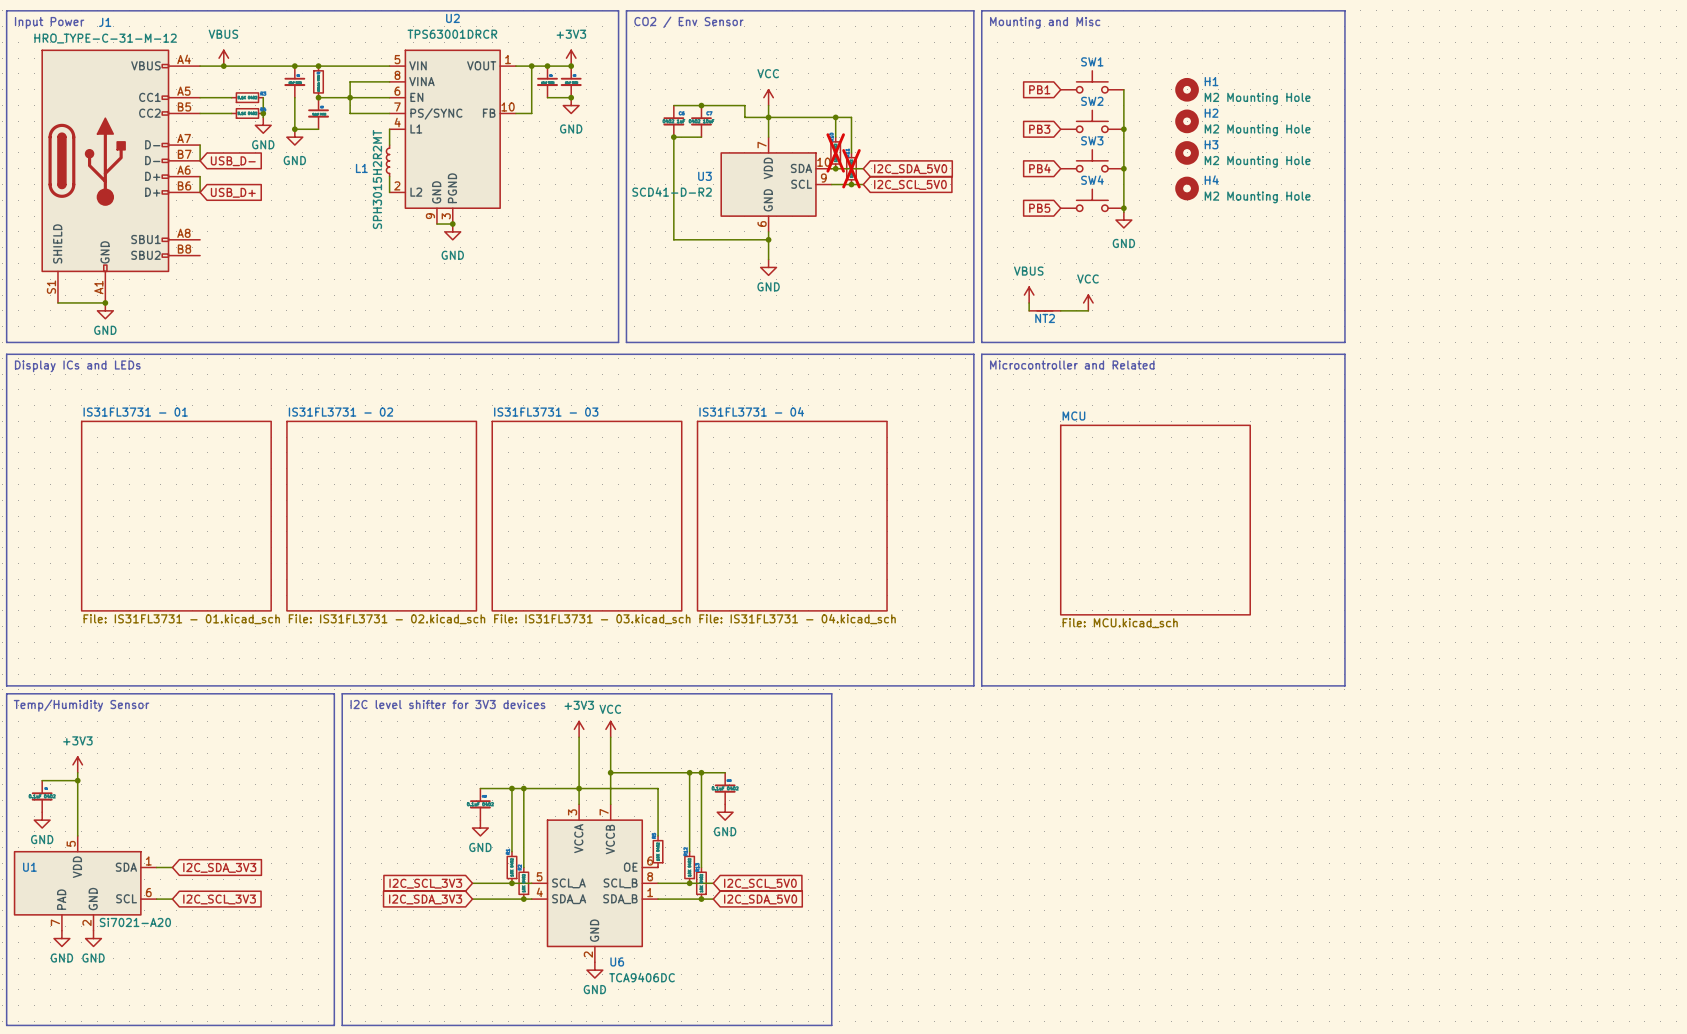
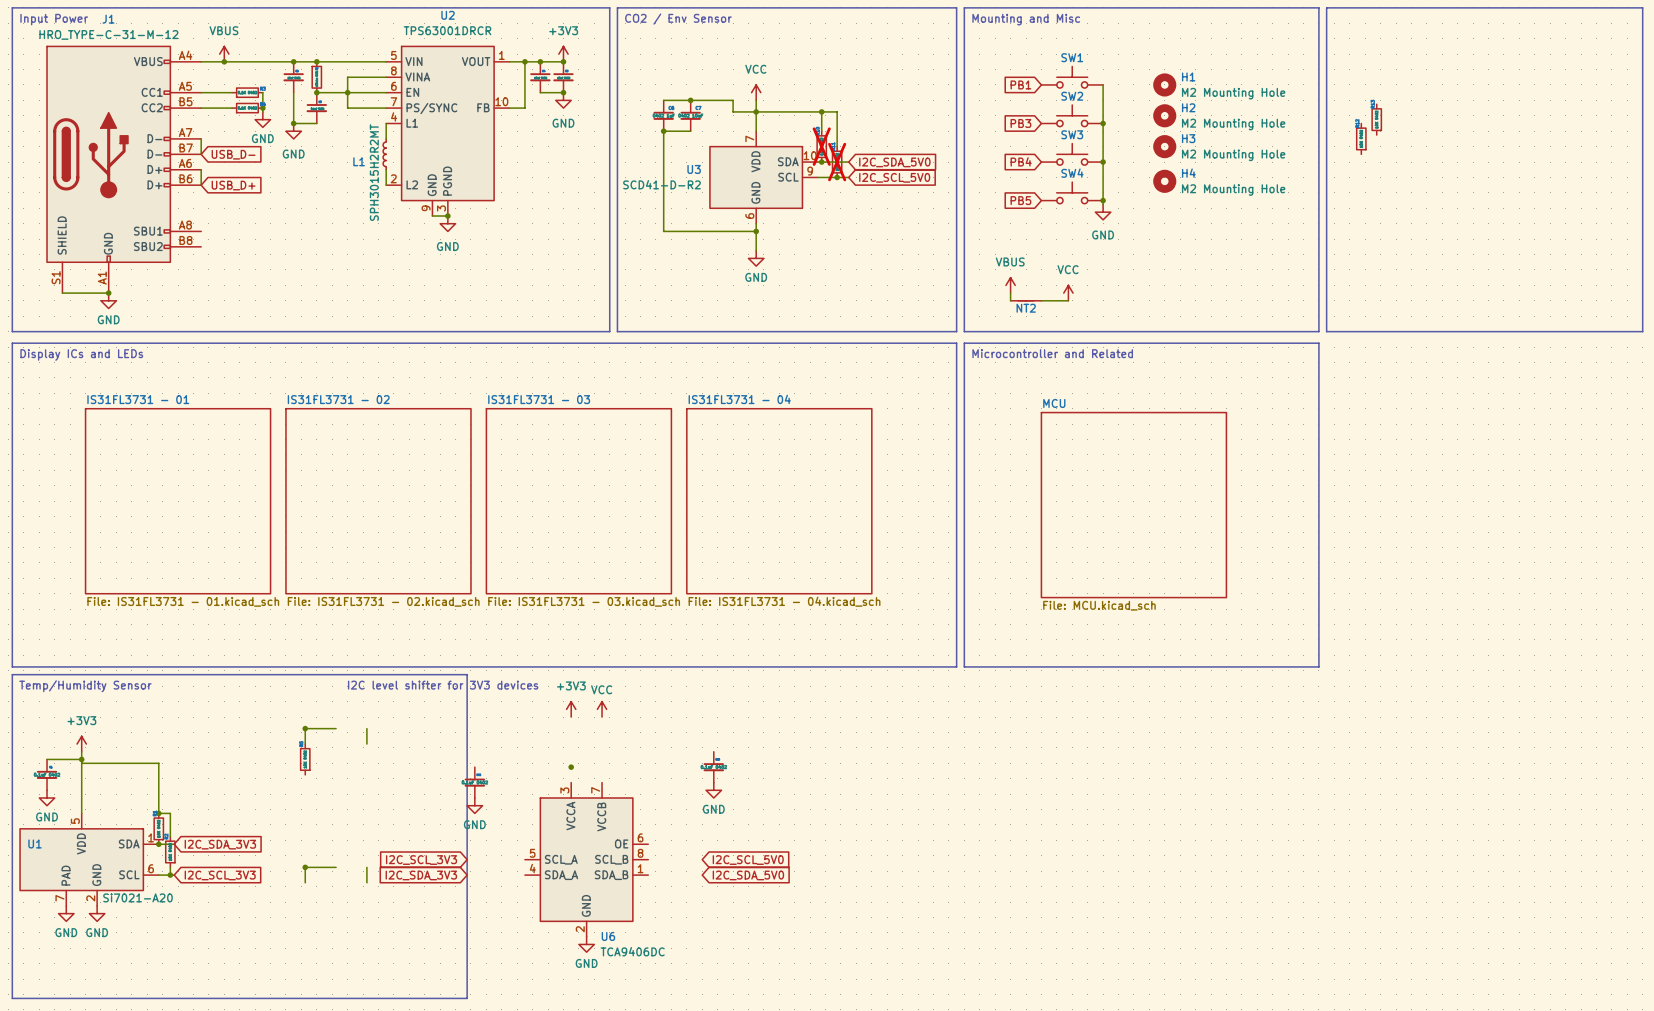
line: none -> (1326, 7) (1642, 7) (1642, 331) (1326, 331) (1326, 7)
line: (334, 693) (334, 1025) -> (332, 674) (339, 674)
line: (342, 693) (342, 1025) -> (332, 998) (339, 998)
line: (472, 693) (831, 693) (831, 1025) (472, 1025) -> (467, 674) (467, 998)
wire: (579, 737) (579, 804) -> none
wire: (610, 737) (610, 804) -> none
junction: none -> (305, 728)
wire: none -> (336, 728) (305, 728) (305, 744)
wire: none -> (366, 728) (366, 744)
wire: (610, 772) (725, 772) -> none
junction: (610, 772) -> none
wire: (689, 772) (689, 851) -> none
junction: (689, 772) -> none
wire: (701, 772) (701, 867) -> none
junction: (701, 772) -> none
wire: none -> (81, 763) (158, 763) (158, 813) (170, 813) (170, 836)
wire: (480, 788) (658, 788) (658, 835) -> none
wire: (511, 788) (511, 851) -> none
junction: (511, 788) -> none
wire: (523, 788) (523, 867) -> none
junction: (523, 788) -> none
junction: none -> (158, 813)
part position: (658, 851) -> (305, 759)
junction: none -> (158, 844)
part position: (511, 867) -> (158, 828)
part position: (689, 867) -> (1361, 138)
wire: (472, 883) (531, 883) -> none
junction: (511, 883) -> none
part position: (523, 883) -> (170, 851)
wire: (658, 883) (713, 883) -> none
junction: (689, 883) -> none
part position: (701, 883) -> (1376, 119)
wire: none -> (170, 867) (170, 875)
junction: none -> (305, 867)
wire: none -> (336, 867) (305, 867) (305, 882)
wire: none -> (366, 867) (366, 882)
junction: none -> (170, 875)
wire: (472, 899) (531, 899) -> none
junction: (523, 899) -> none
wire: (658, 899) (713, 899) -> none
junction: (701, 899) -> none

